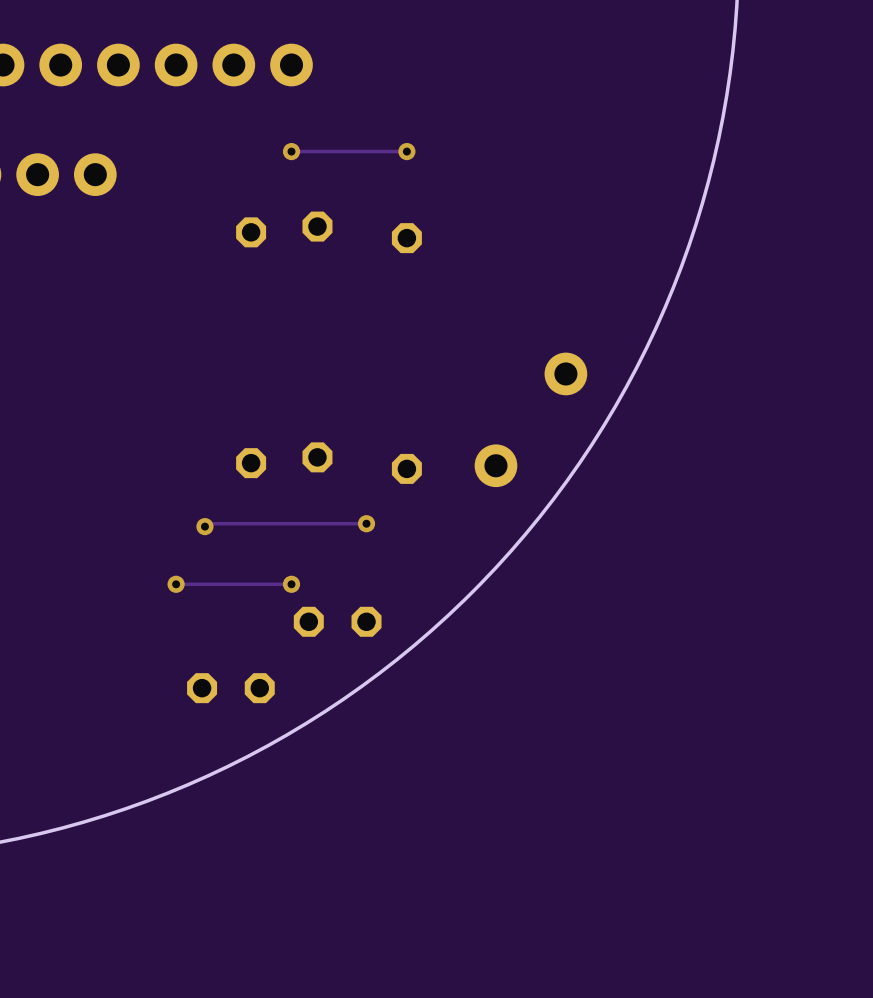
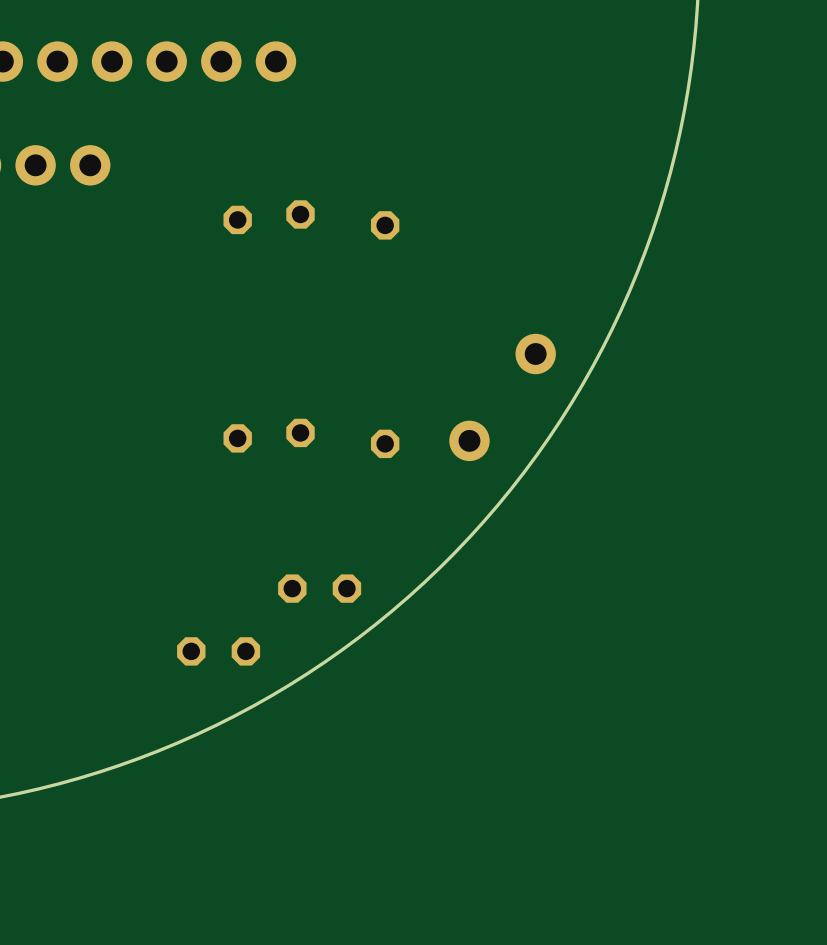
via: (291, 151) -> none
track: (406, 151) (291, 151) -> none
via: (406, 151) -> none
track: (366, 523) (207, 523) (204, 526) -> none
via: (366, 523) -> none
via: (204, 526) -> none
via: (176, 584) -> none
track: (291, 584) (176, 584) -> none
via: (291, 584) -> none

